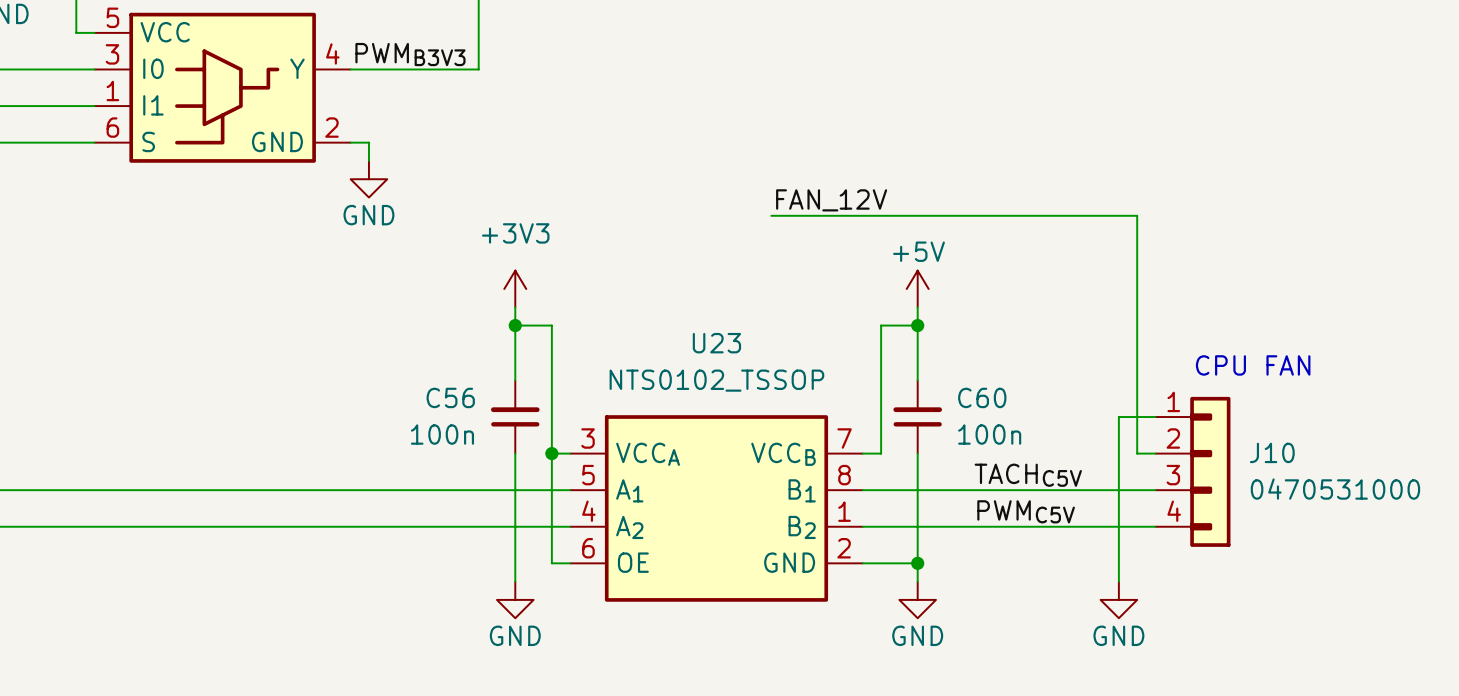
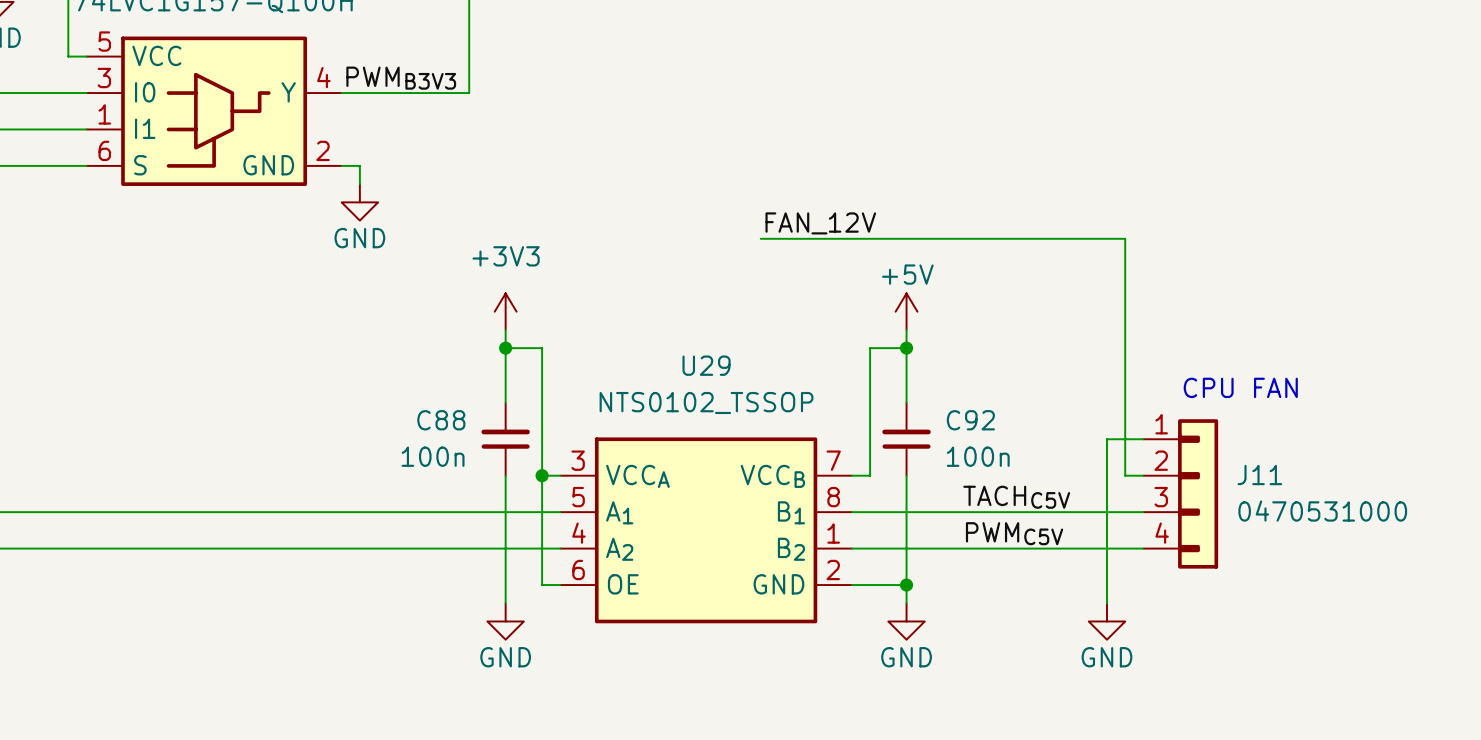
U23 name: U23 (716, 343) -> U29 (706, 365)
C56 name: C56 (450, 397) -> C88 (441, 420)
C60 name: C60 (982, 397) -> C92 (970, 420)
J10 name: J10 (1272, 452) -> J11 (1259, 475)

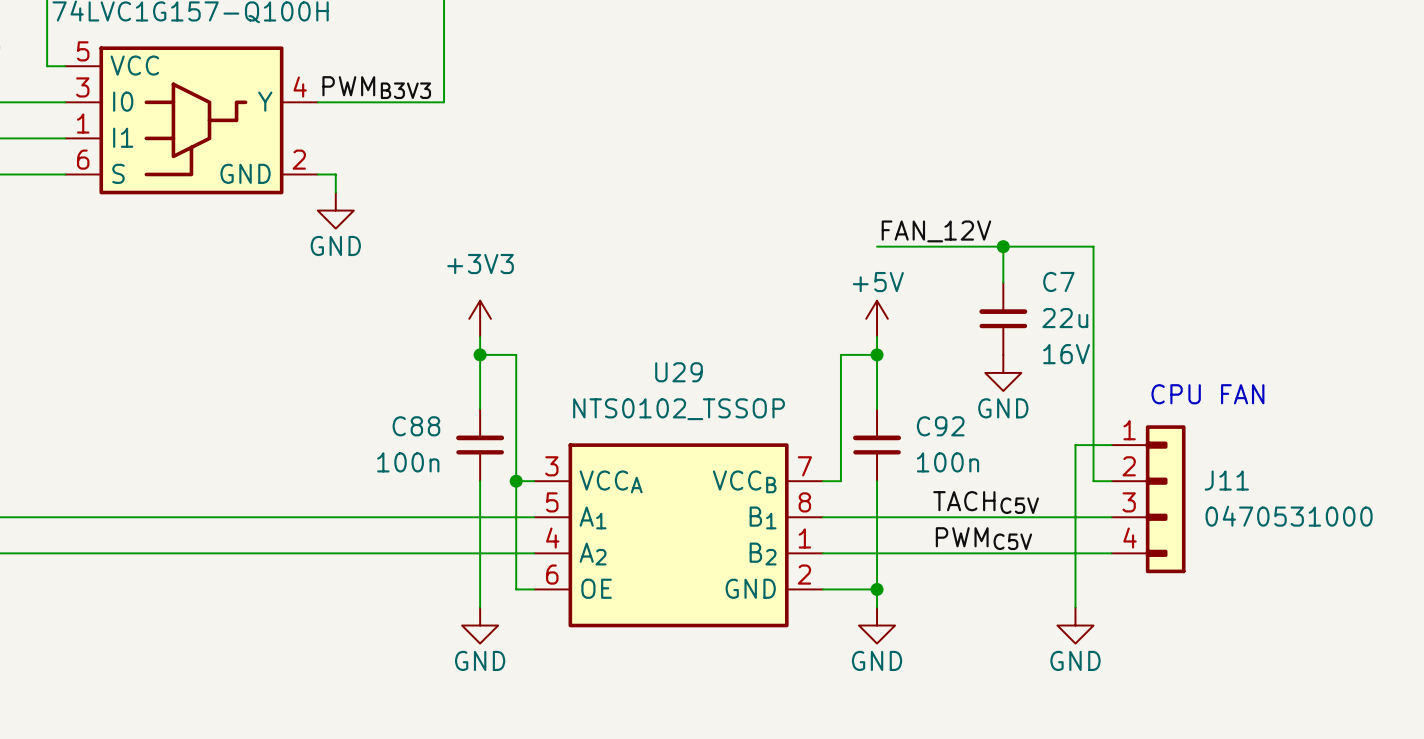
label position: FAN_12V (820, 223) -> FAN_12V (936, 231)
wire: (760, 238) (906, 238) -> none
wire: none -> (1003, 246) (1003, 282)
junction: none -> (1003, 246)
C7: none -> (1003, 318)
power symbol: none -> GND (1003, 372)

